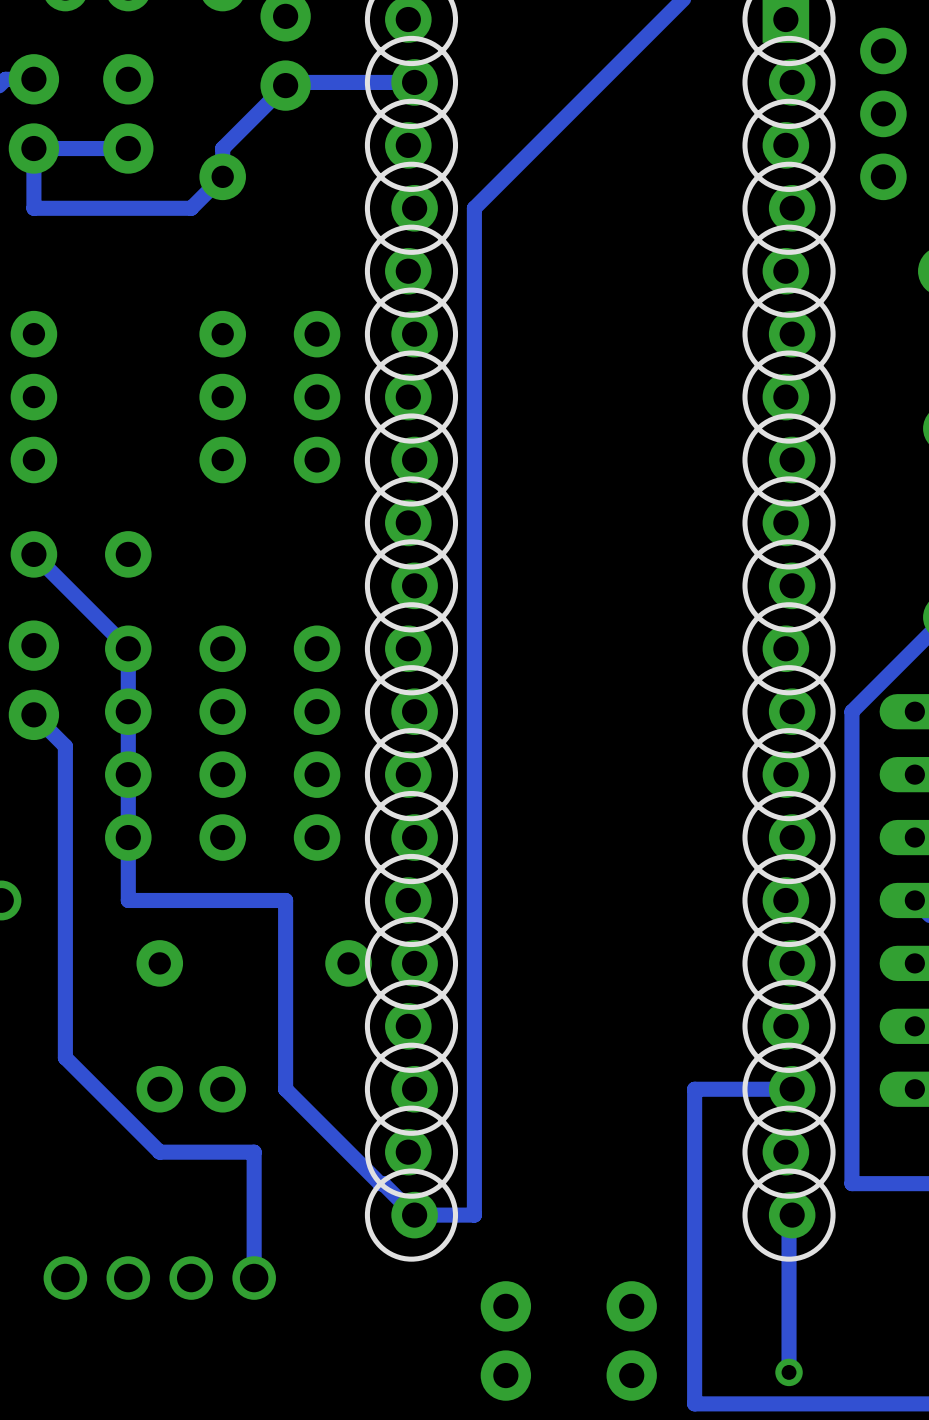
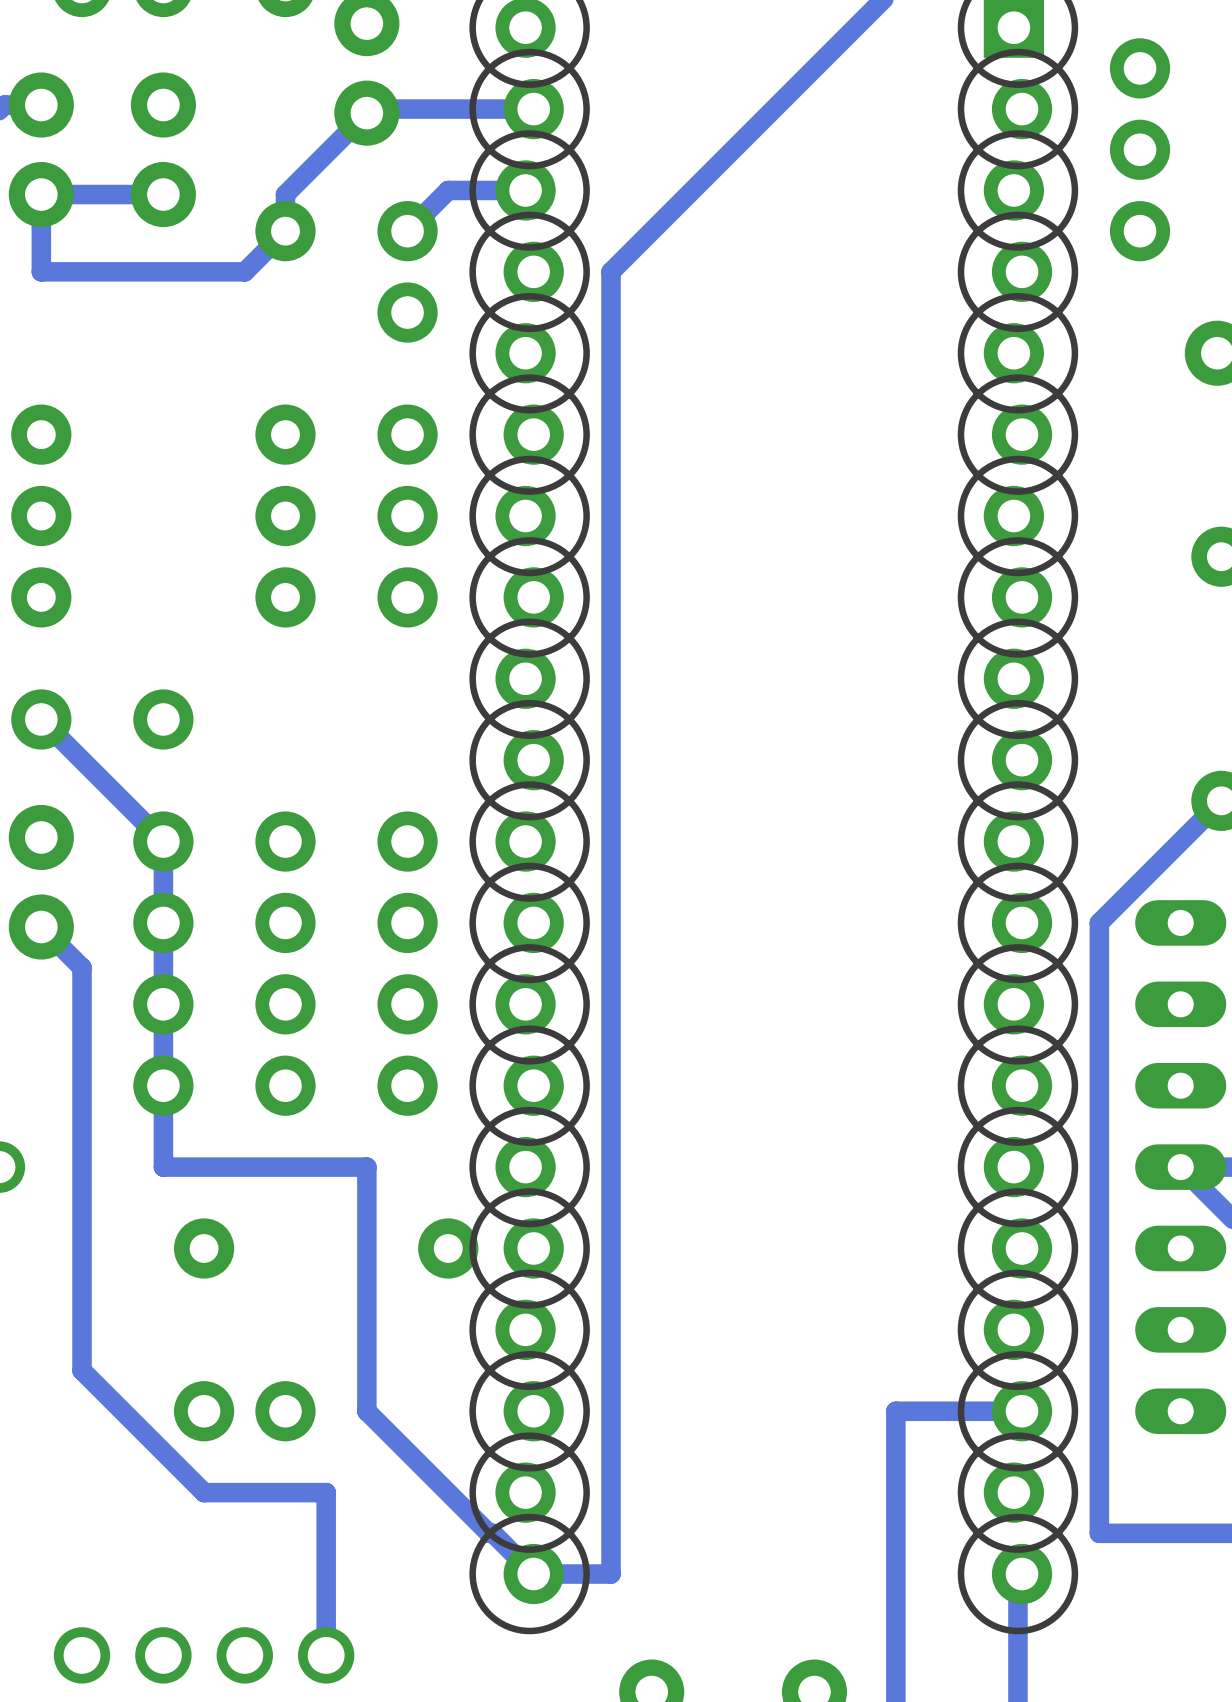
track: none -> (525, 190) (448, 190) (407, 231)
part: none -> (407, 231)
part: none -> (407, 312)

